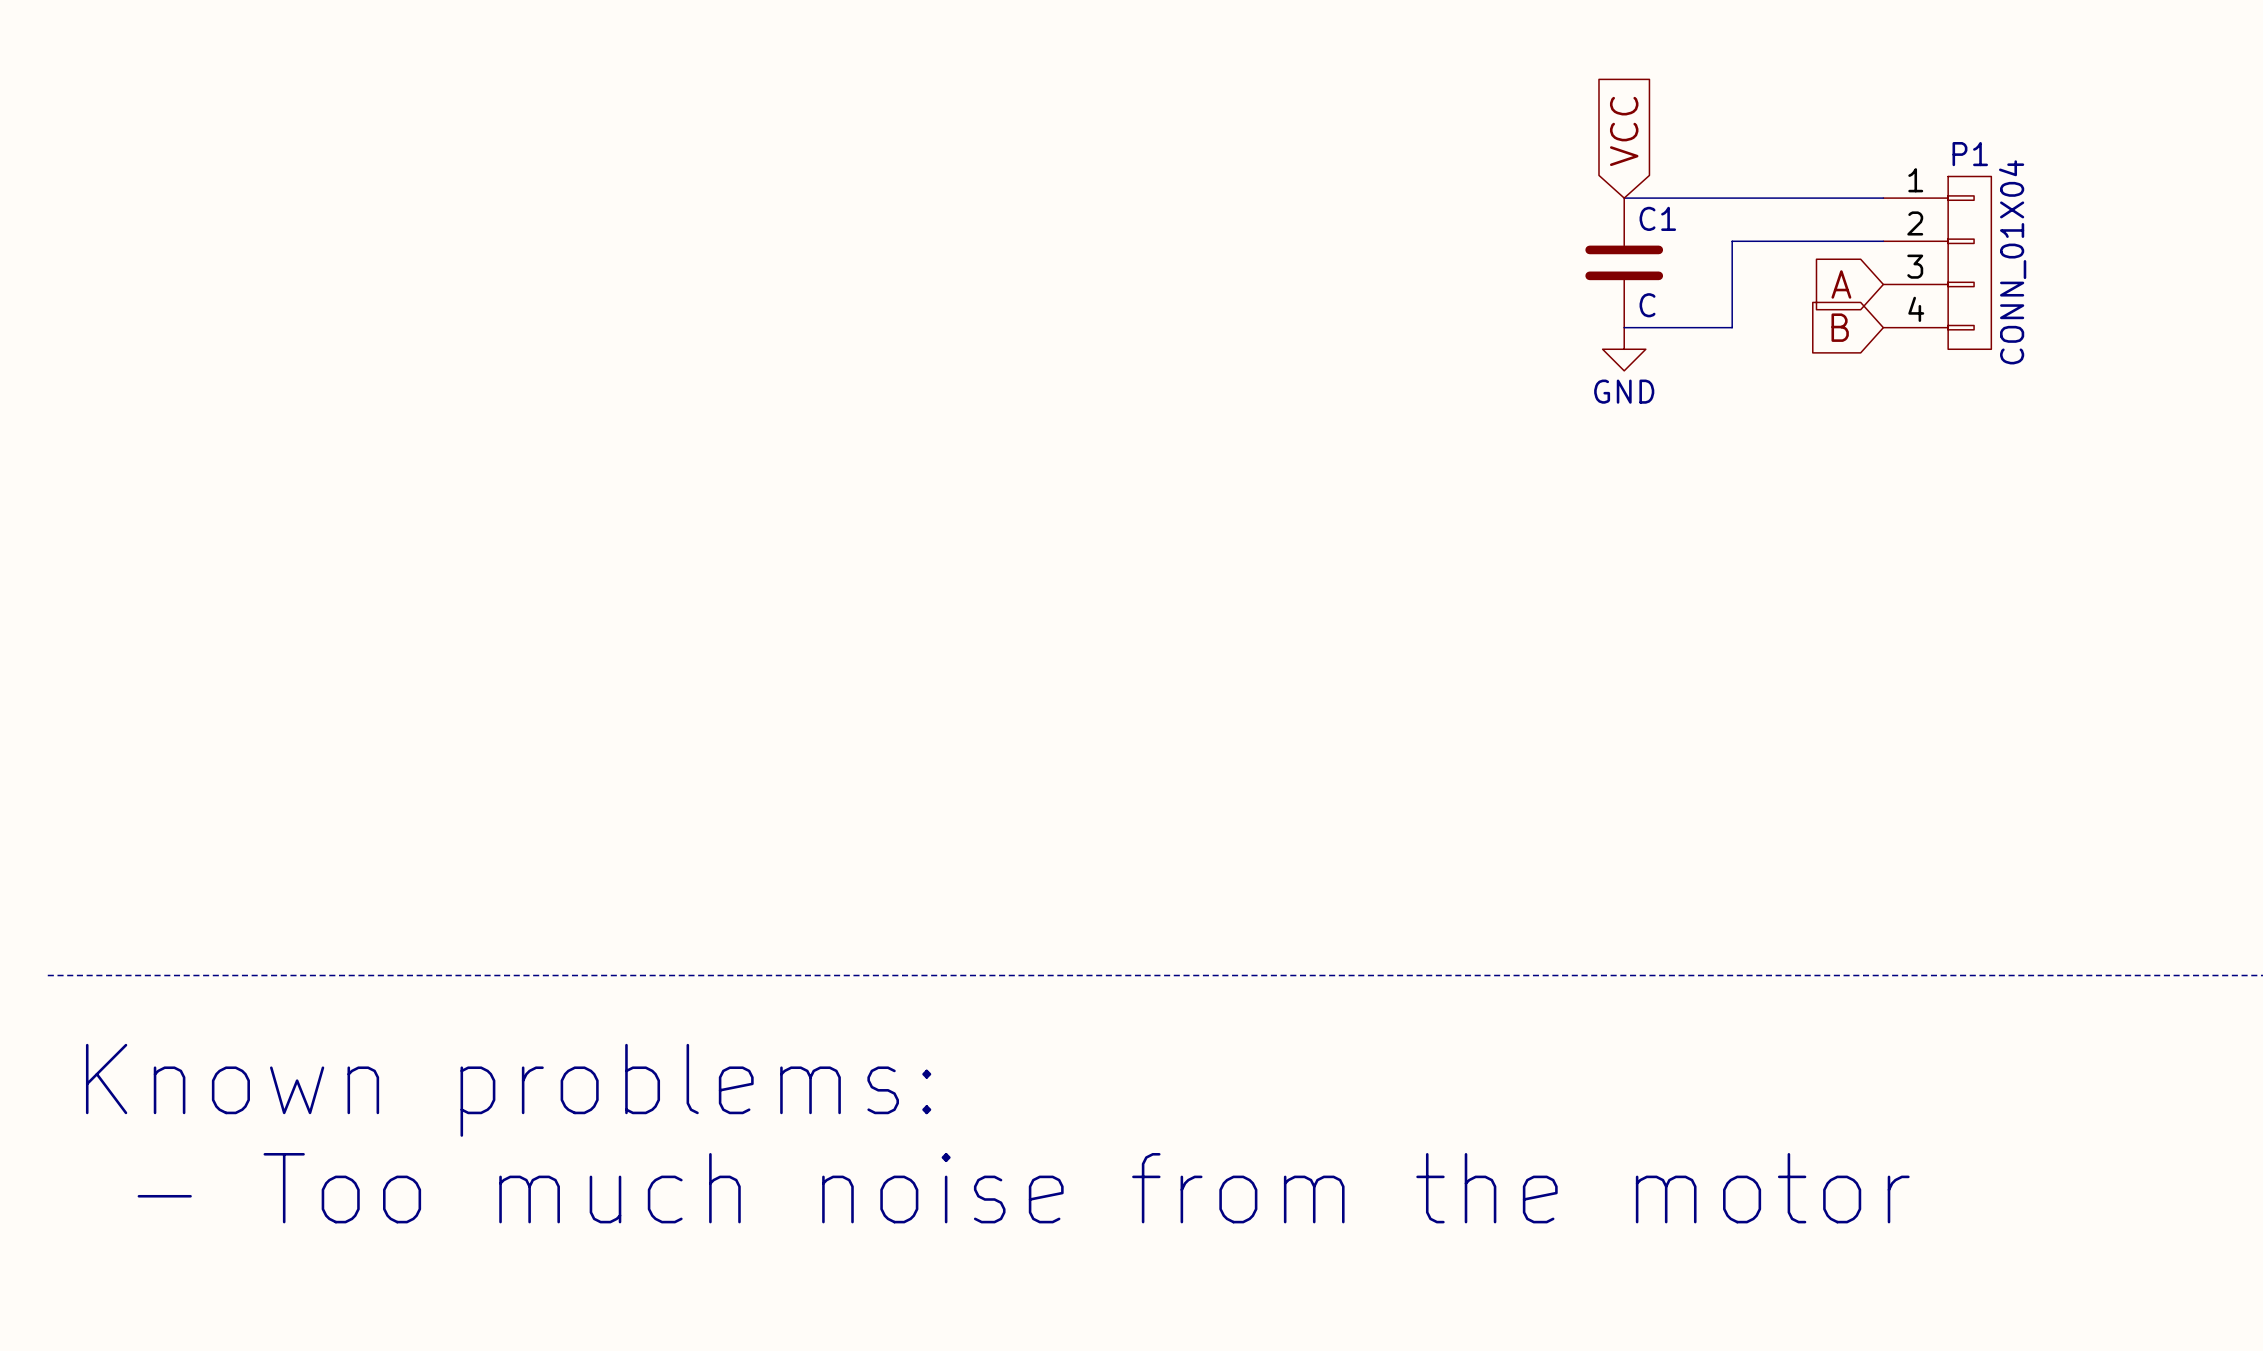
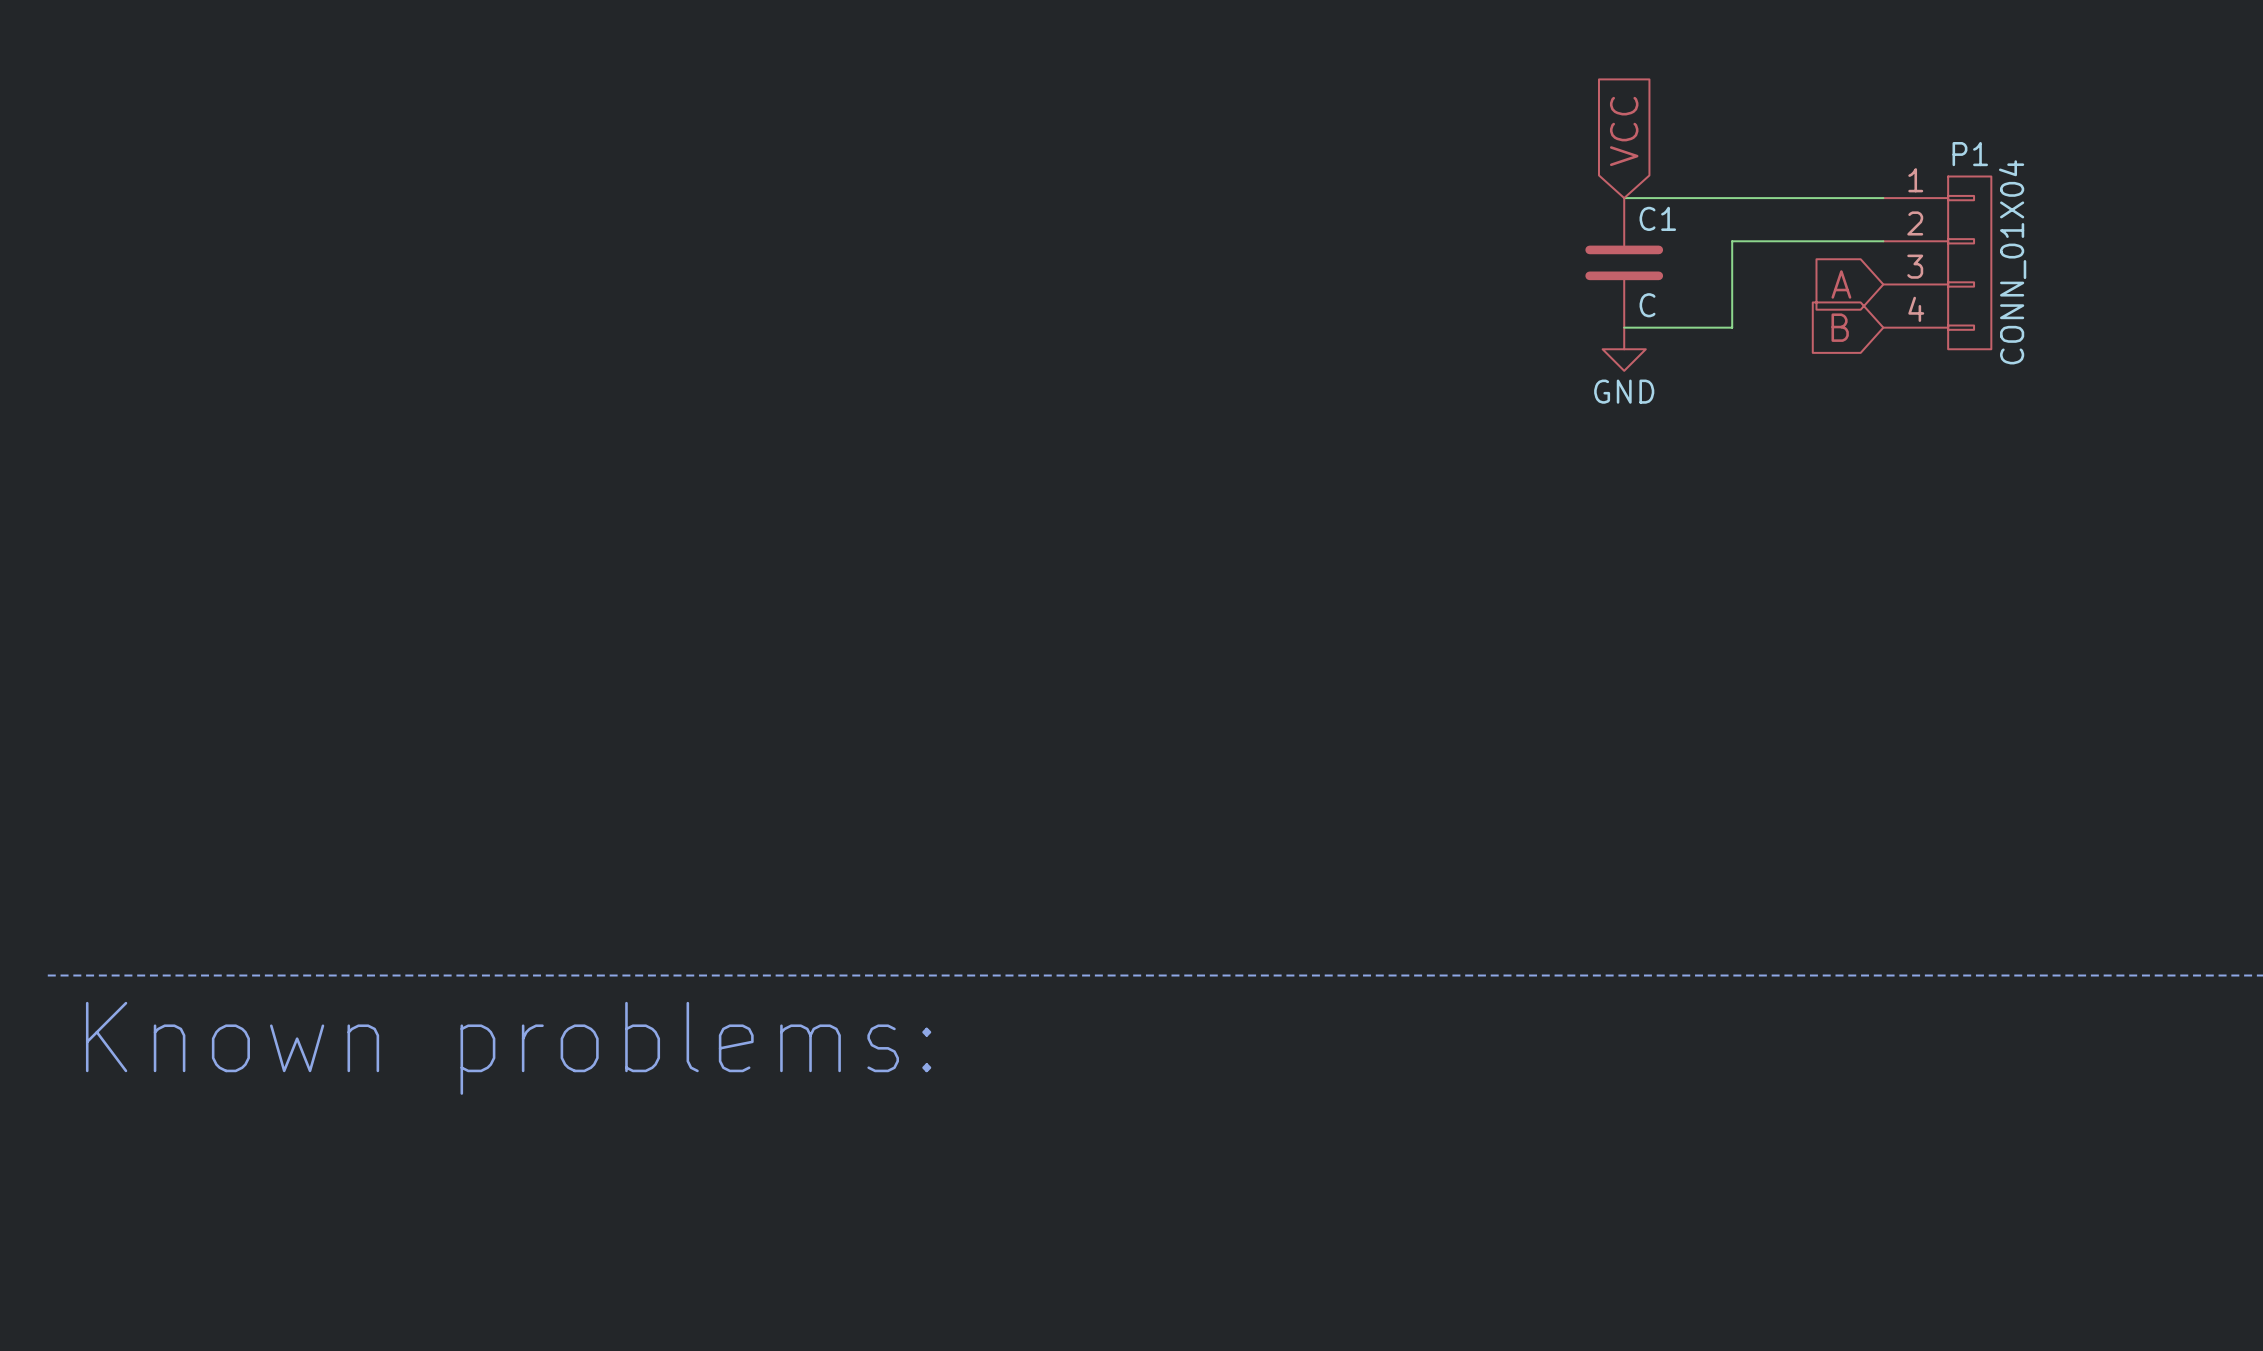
text position: Known problems: (508, 1090) -> Known problems: (508, 1048)
text: - Too much noise from the motor (1023, 1188) -> none

